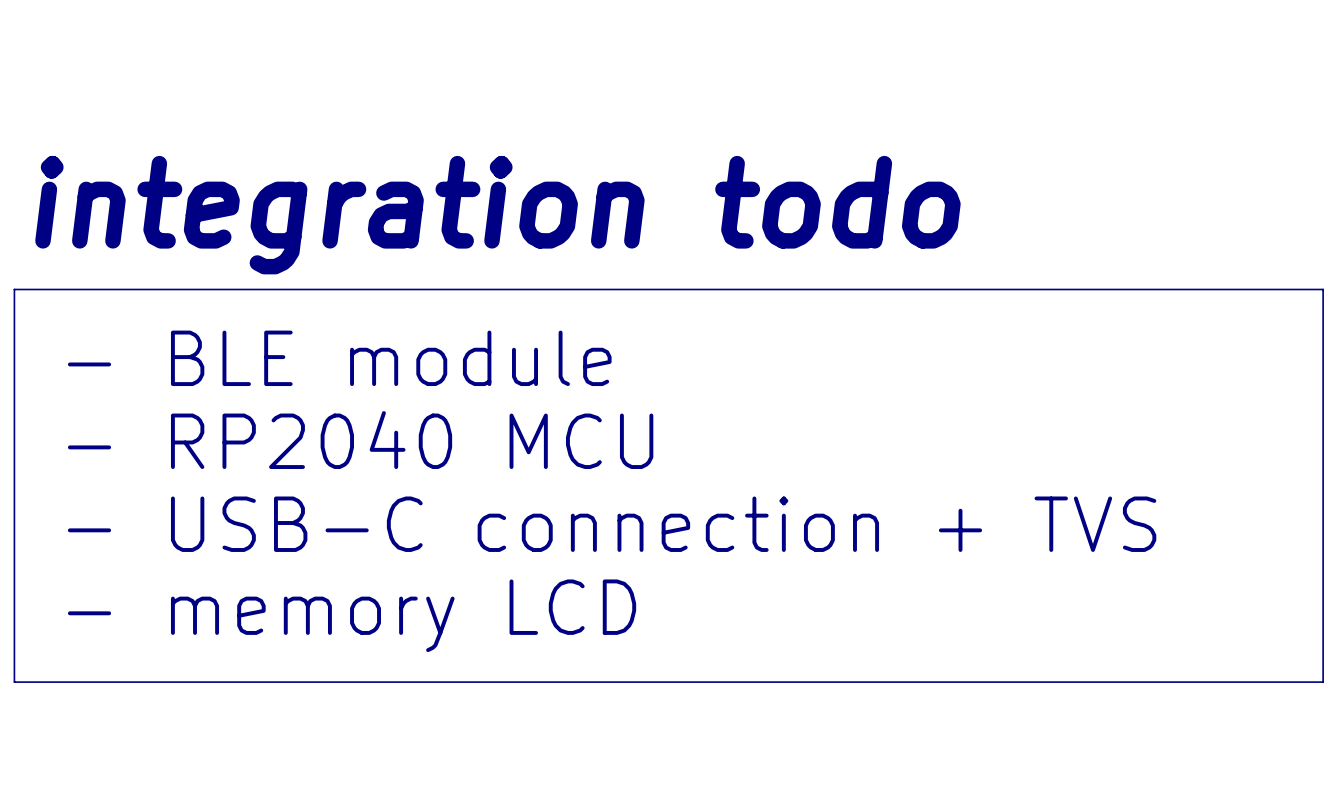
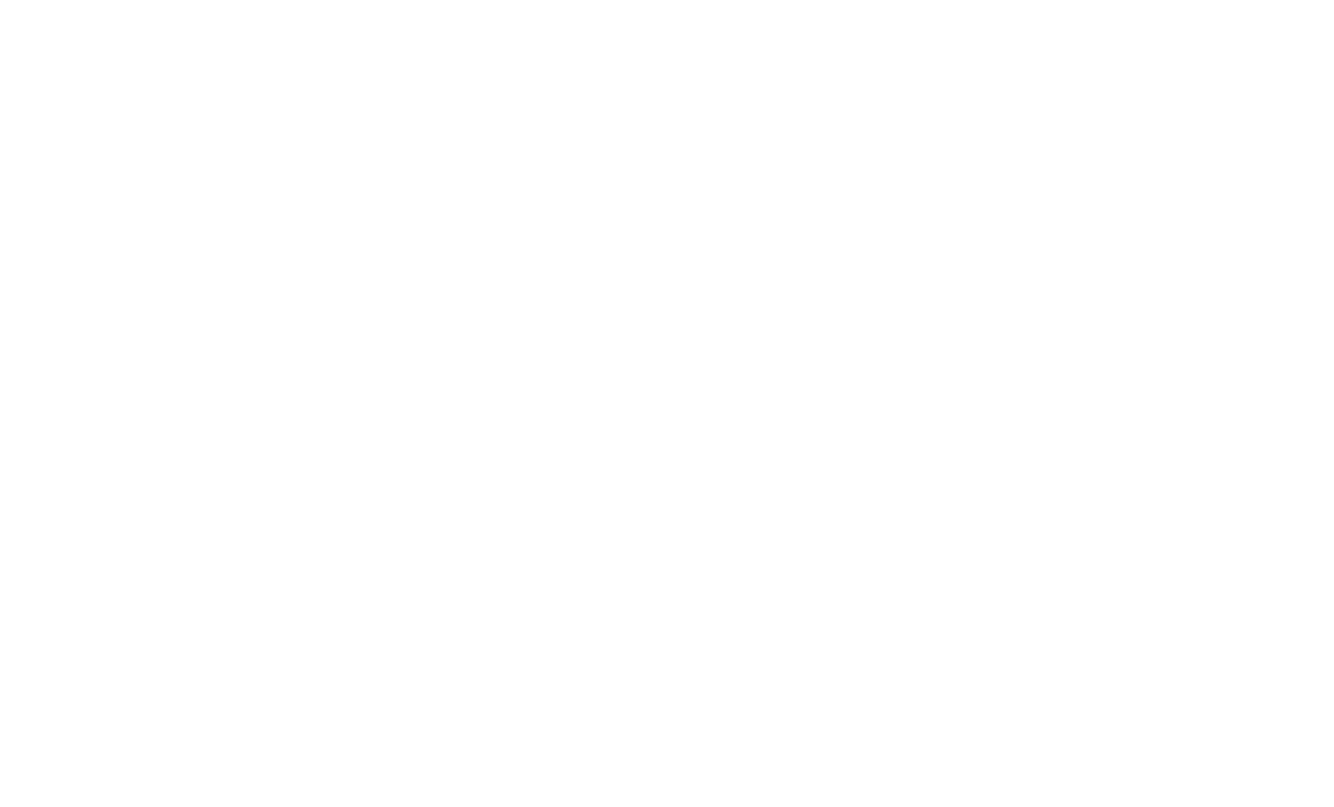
text: integration todo (497, 215) -> none
line: (14, 289) (1323, 289) (1323, 682) (14, 682) (14, 289) -> none
text: - BLE module (339, 358) -> none
text: - RP2040 MCU (360, 440) -> none
text: - USB-C connection + TVS (612, 524) -> none
text: - memory LCD (352, 615) -> none

